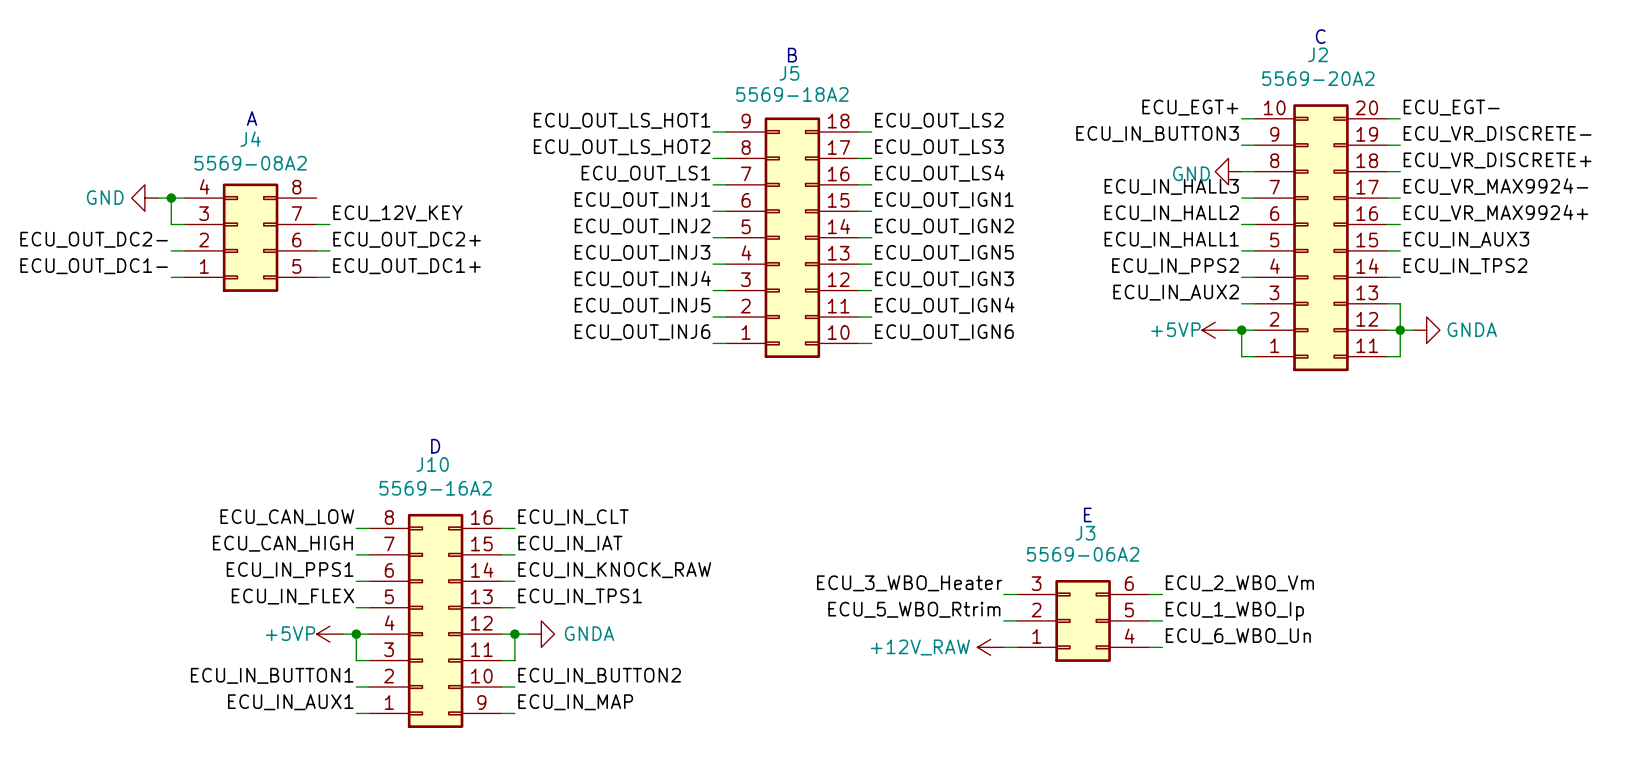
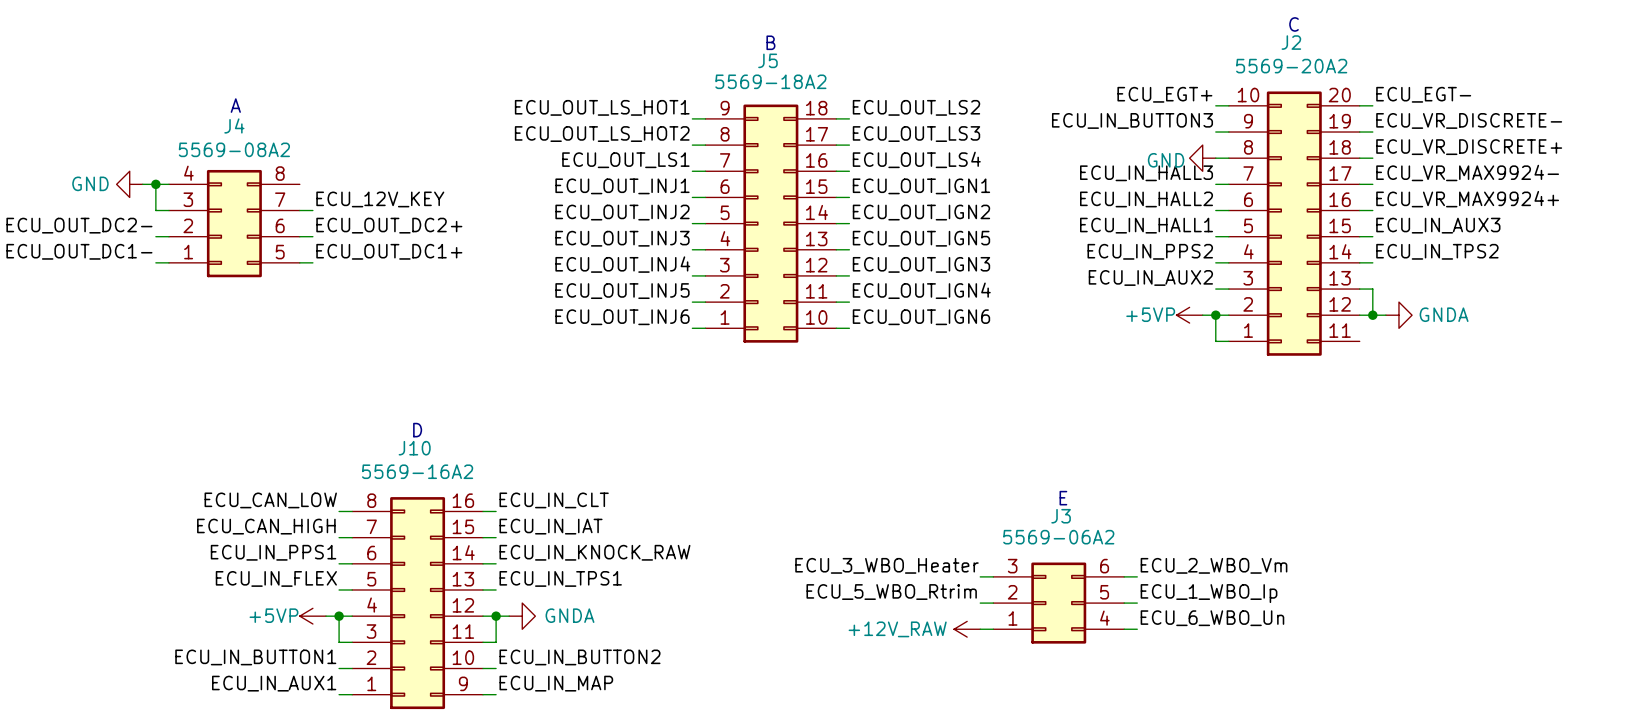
wire: (1400, 330) (1400, 356) (1387, 356) -> none

